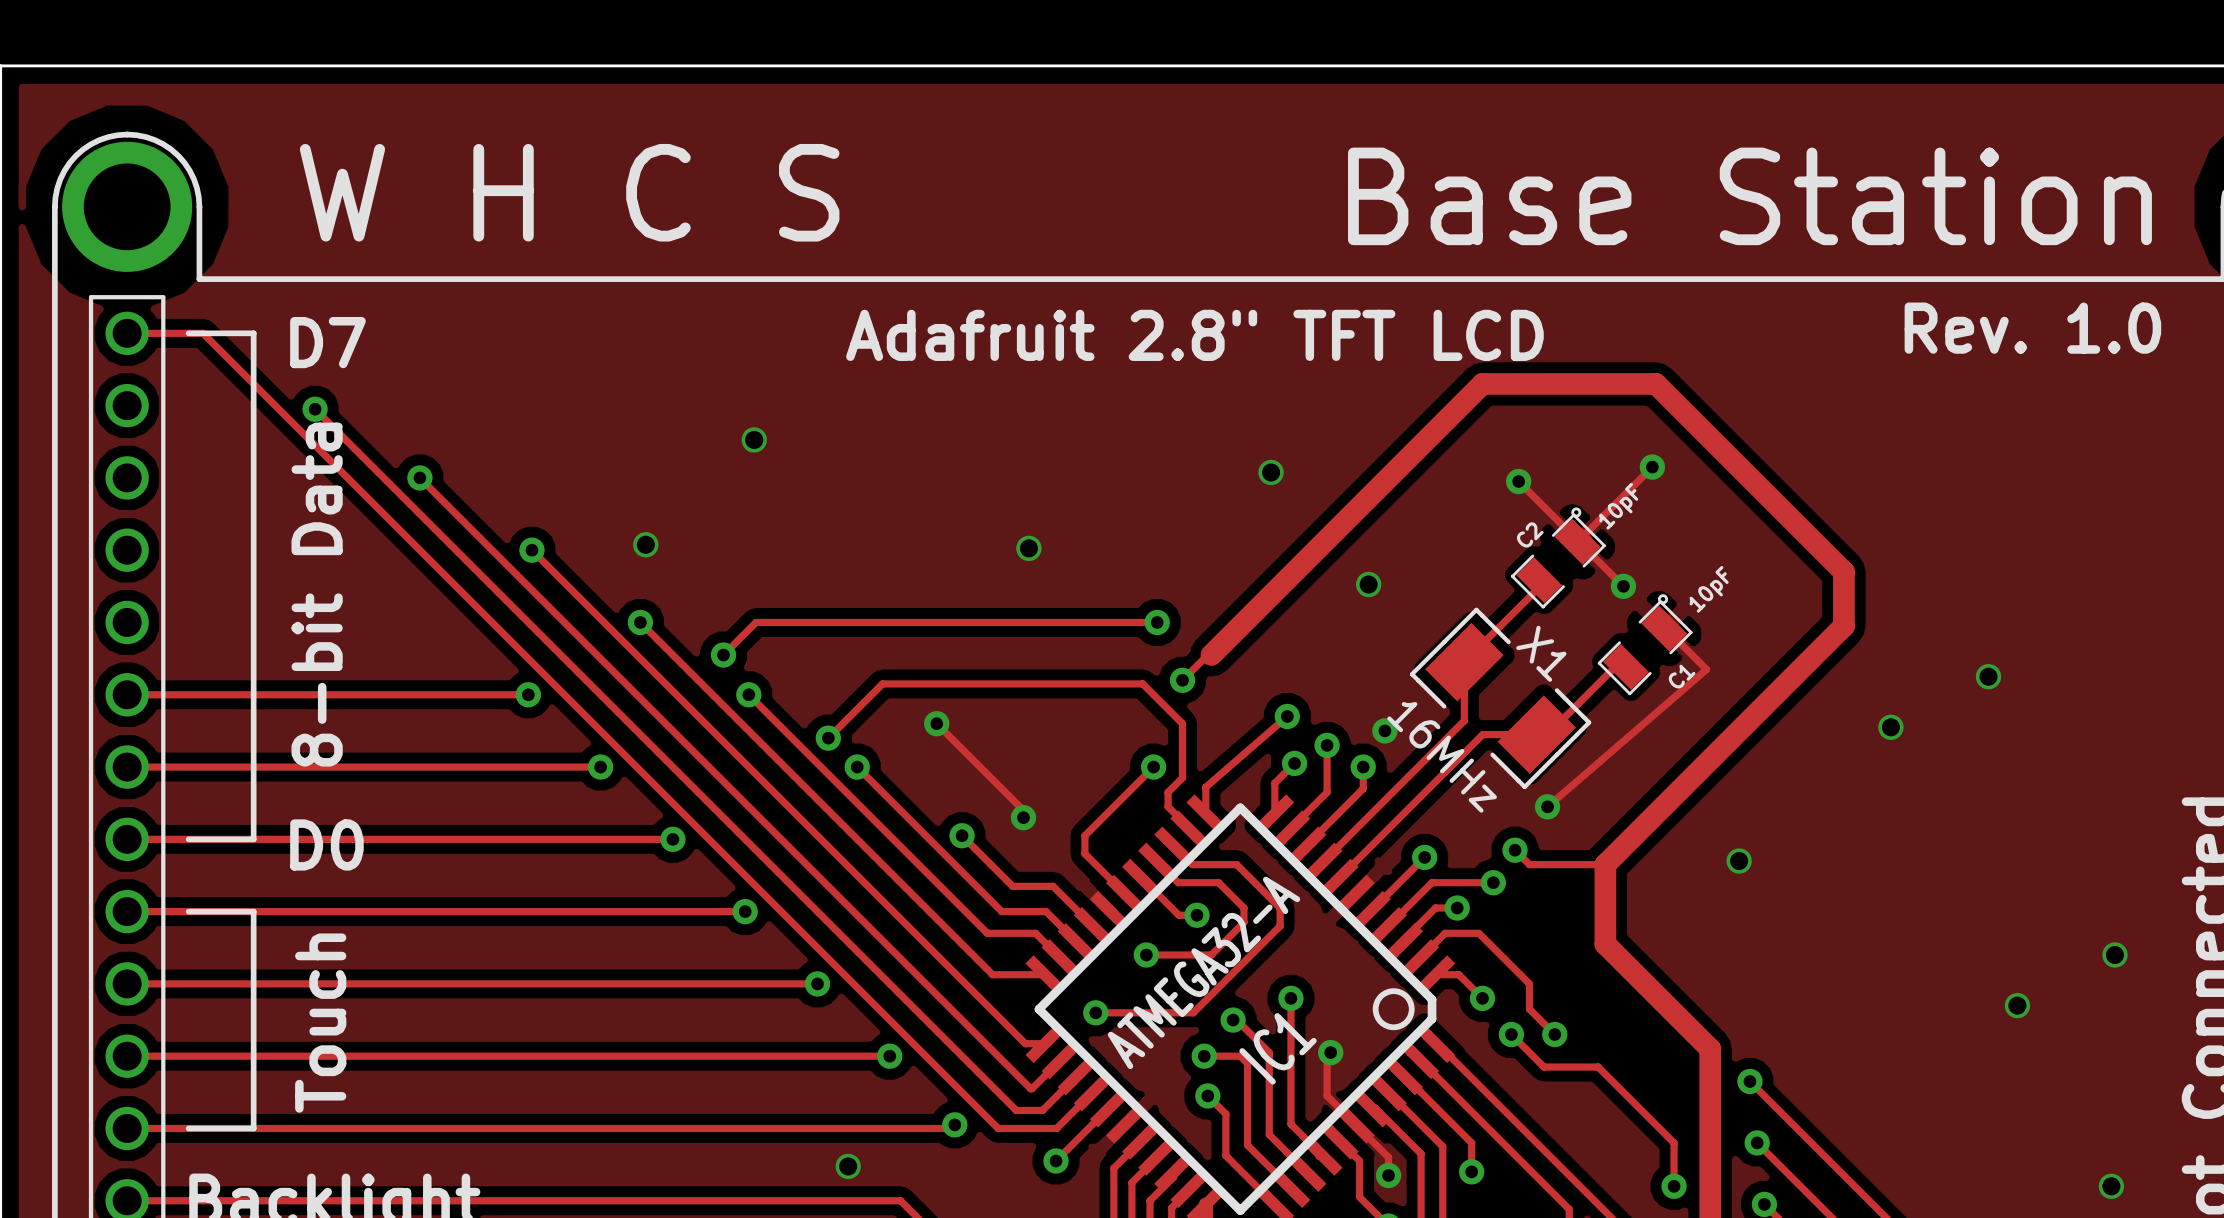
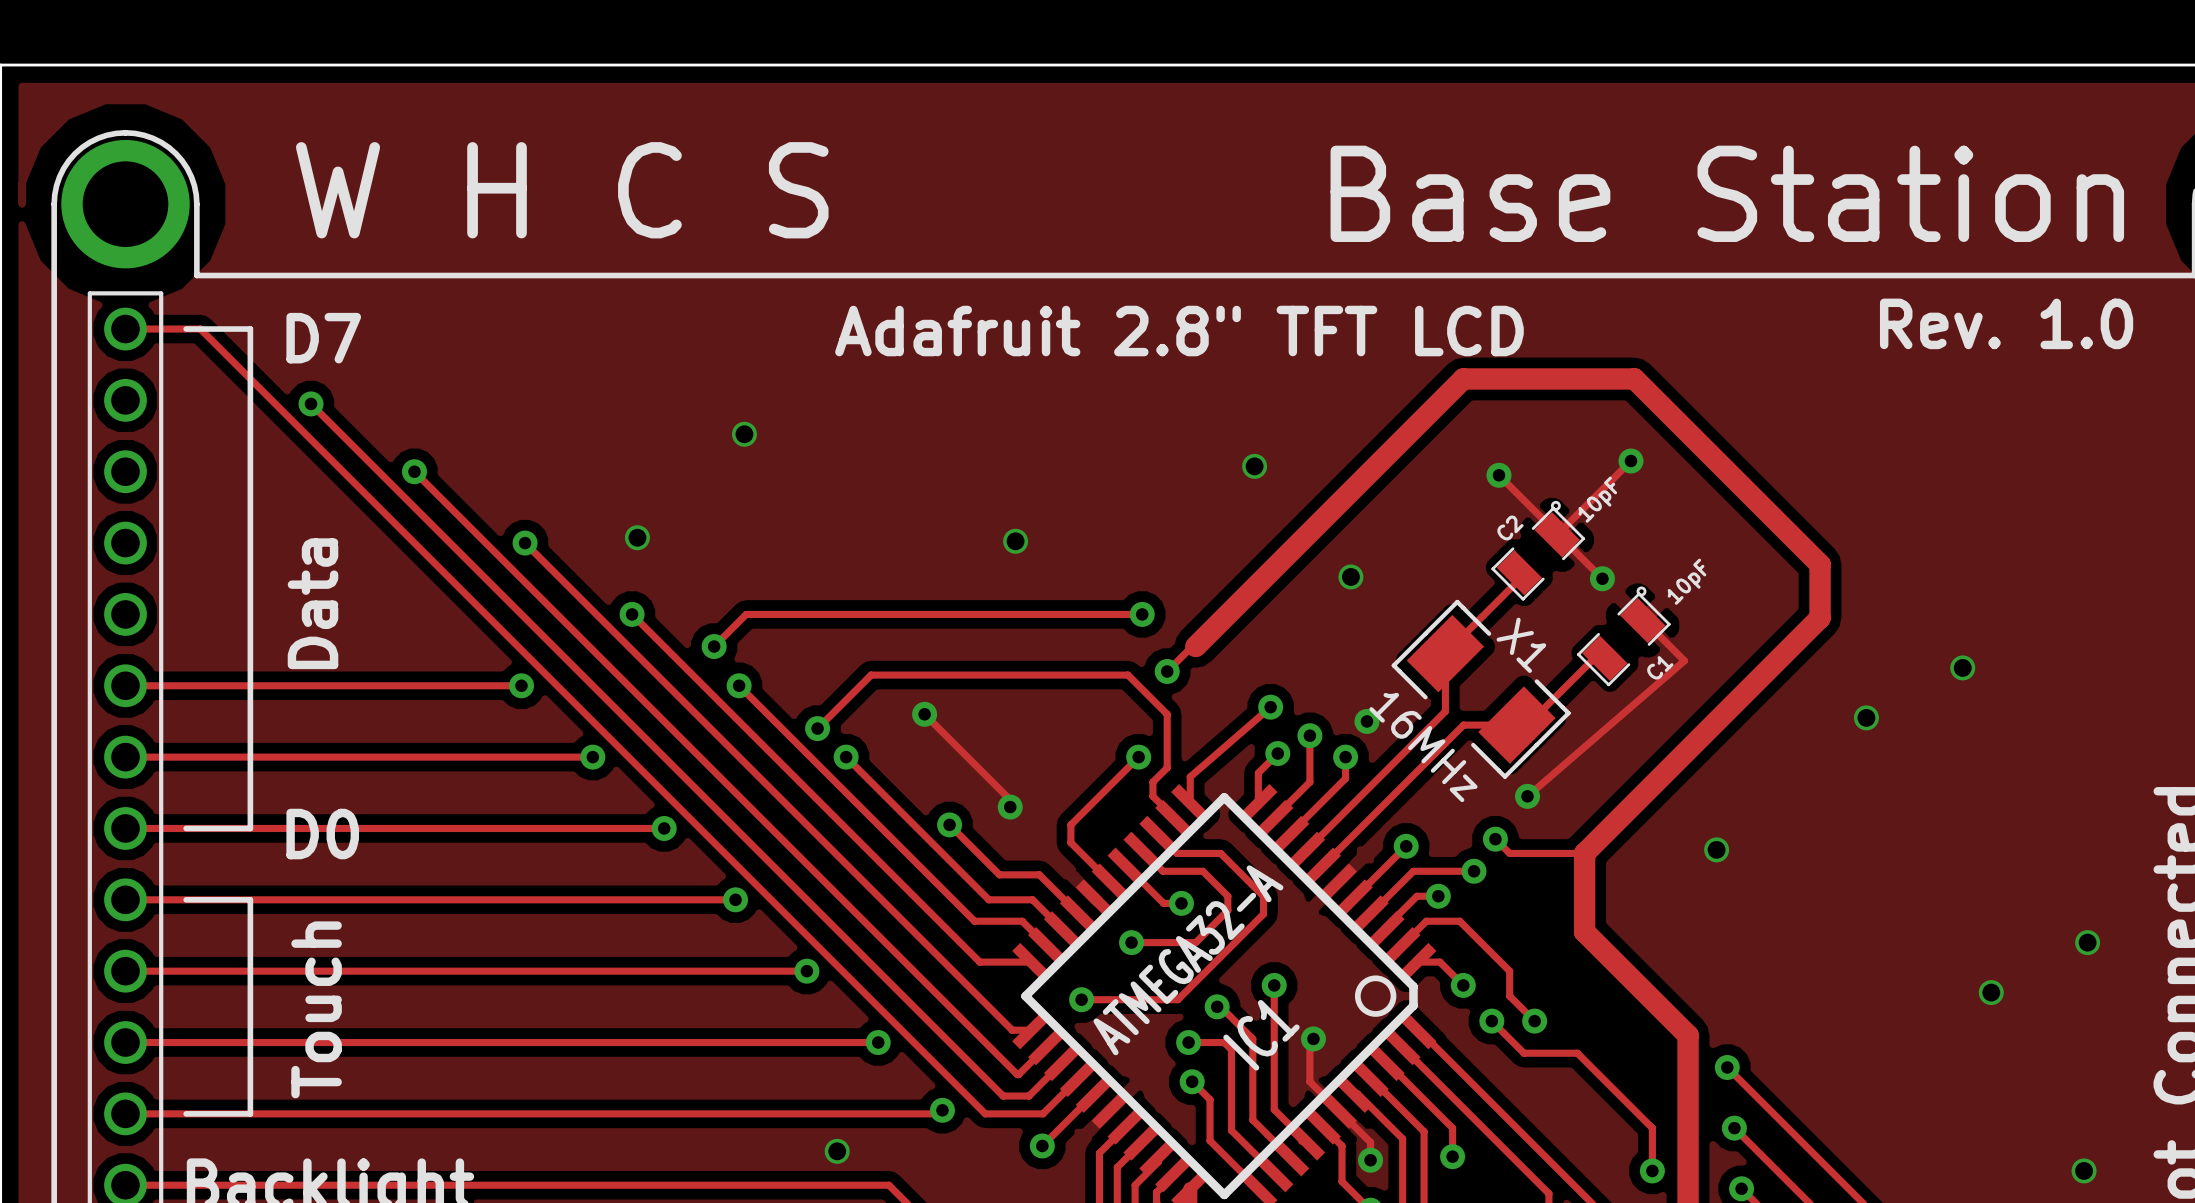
text: 8-bit Data (317, 594) -> Data (313, 603)

